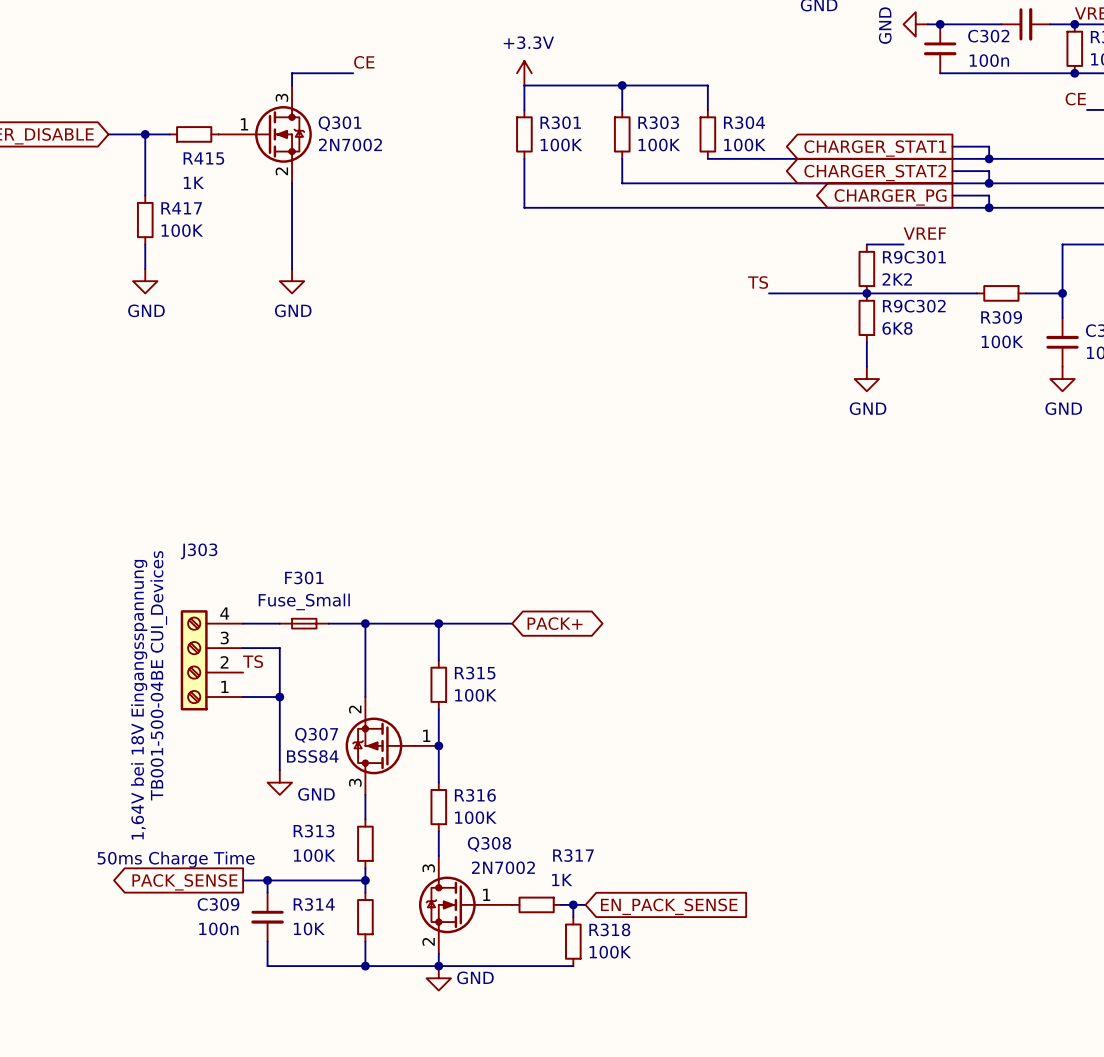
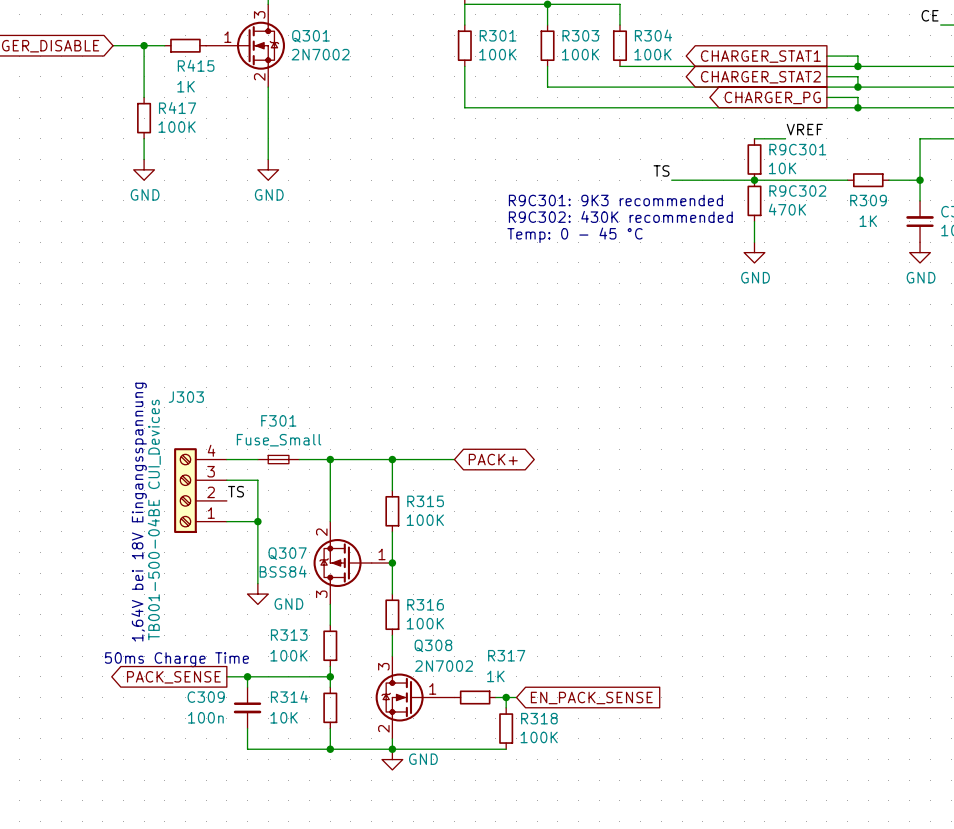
R9C301 value: 2K2 (897, 279) -> 10K (782, 168)
text: none -> R9C301: 9K3 recommended (615, 200)
R9C302 value: 6K8 (897, 328) -> 470K (787, 209)
text: none -> R9C302: 430K recommended (620, 216)
R309 value: 100K (1002, 341) -> 1K (868, 221)
text: none -> Temp: 0 - 45 °C (574, 235)

